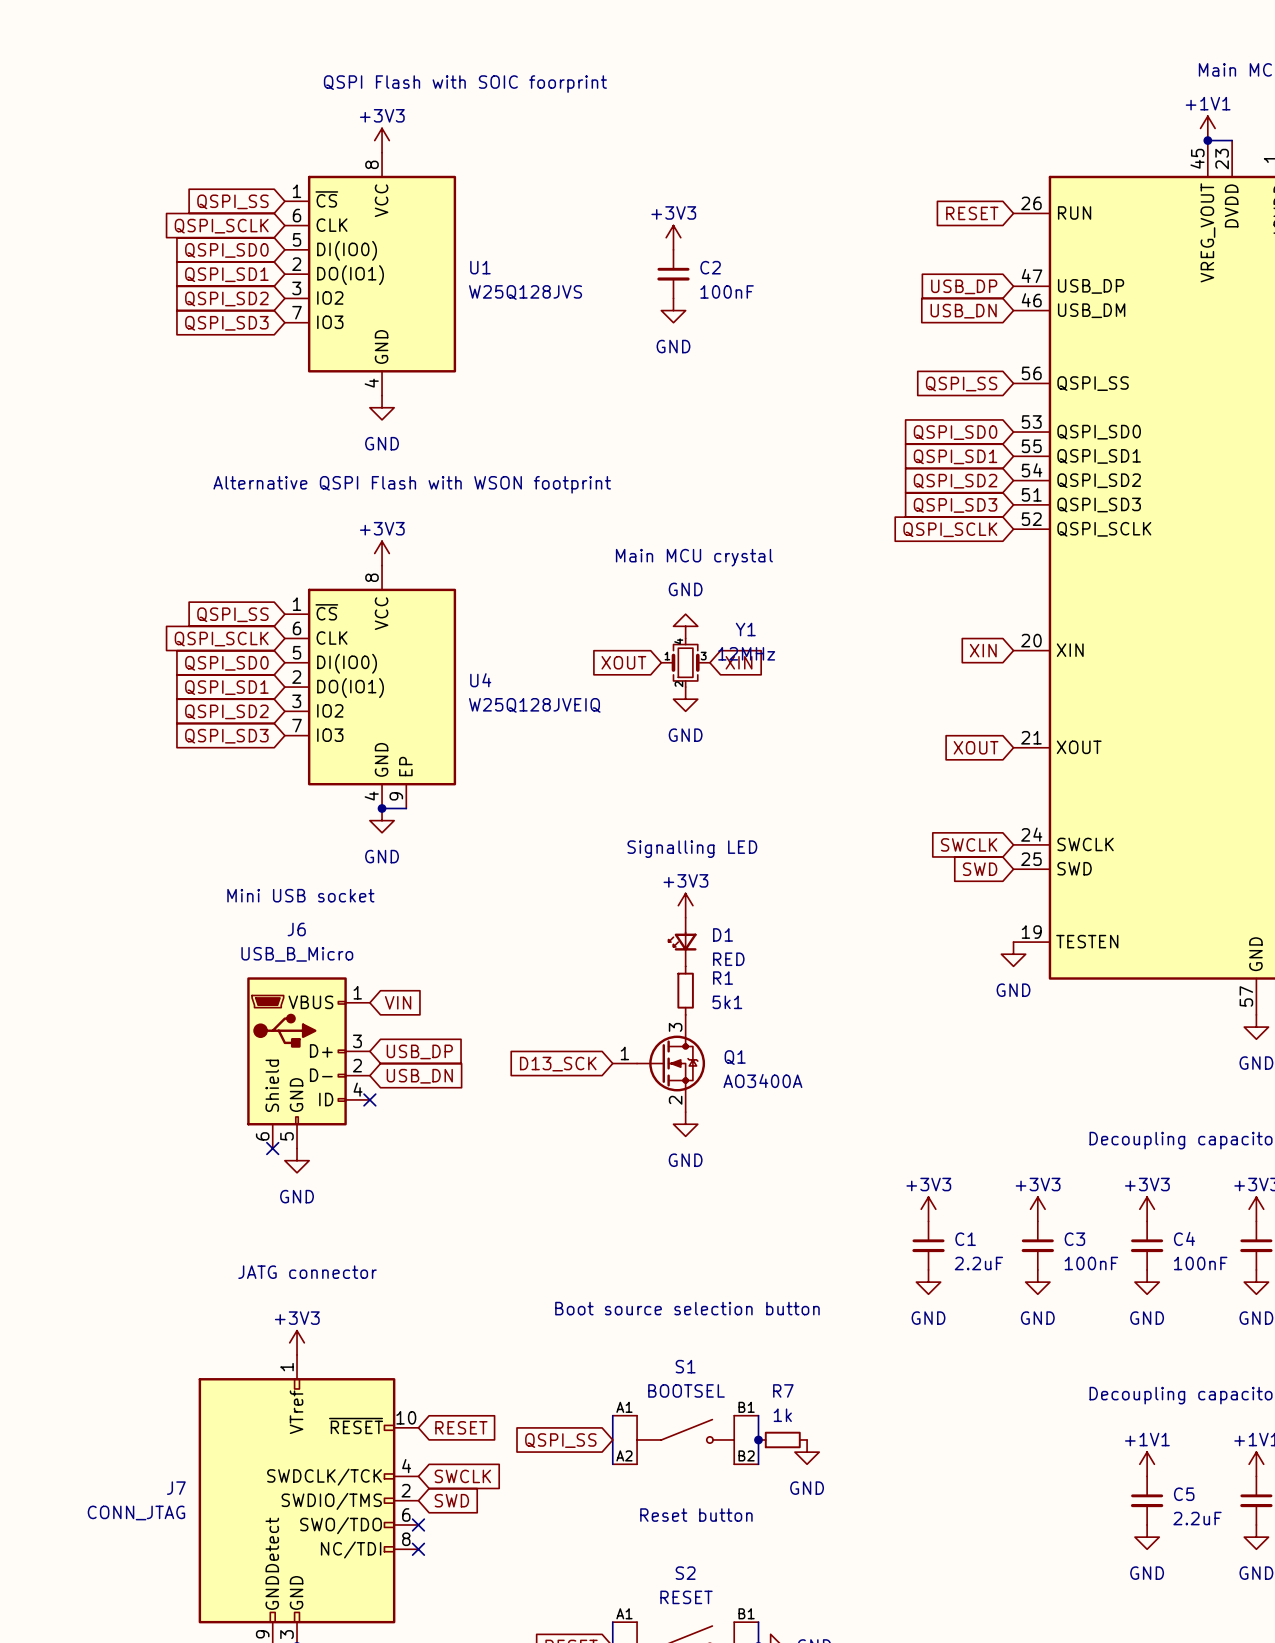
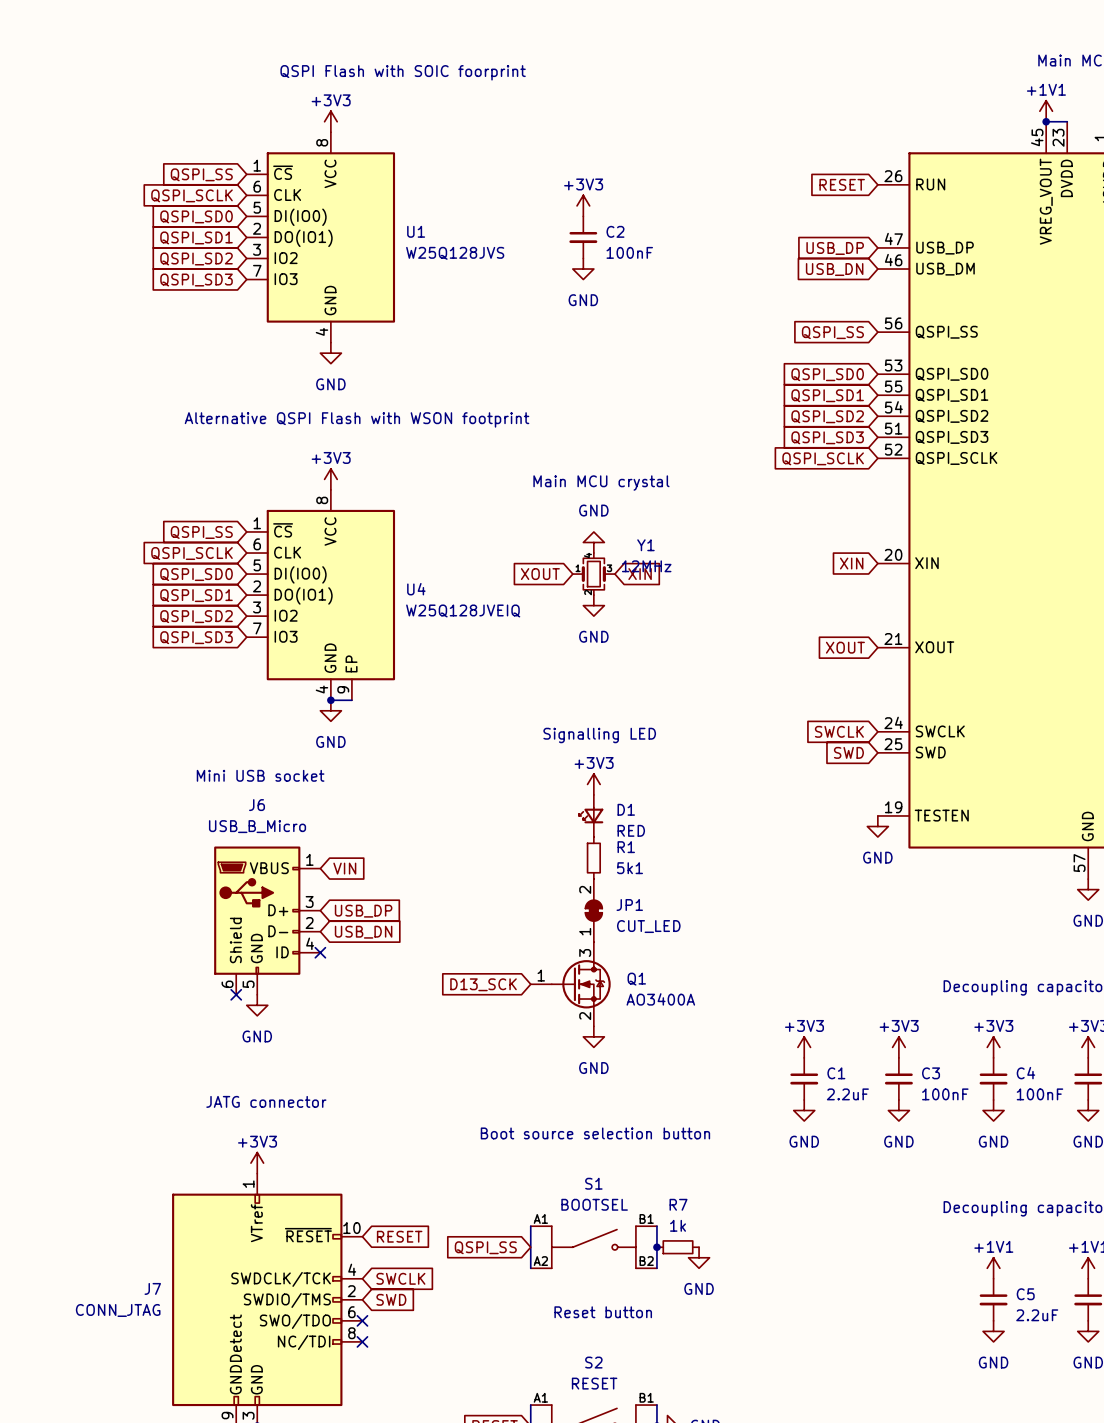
JP1: none -> CUT_LED (593, 910)
Q1 position: (658, 1063) -> (570, 984)
global label position: D13_SCK (558, 1064) -> D13_SCK (483, 984)
power symbol position: GND (685, 1124) -> GND (593, 1036)

